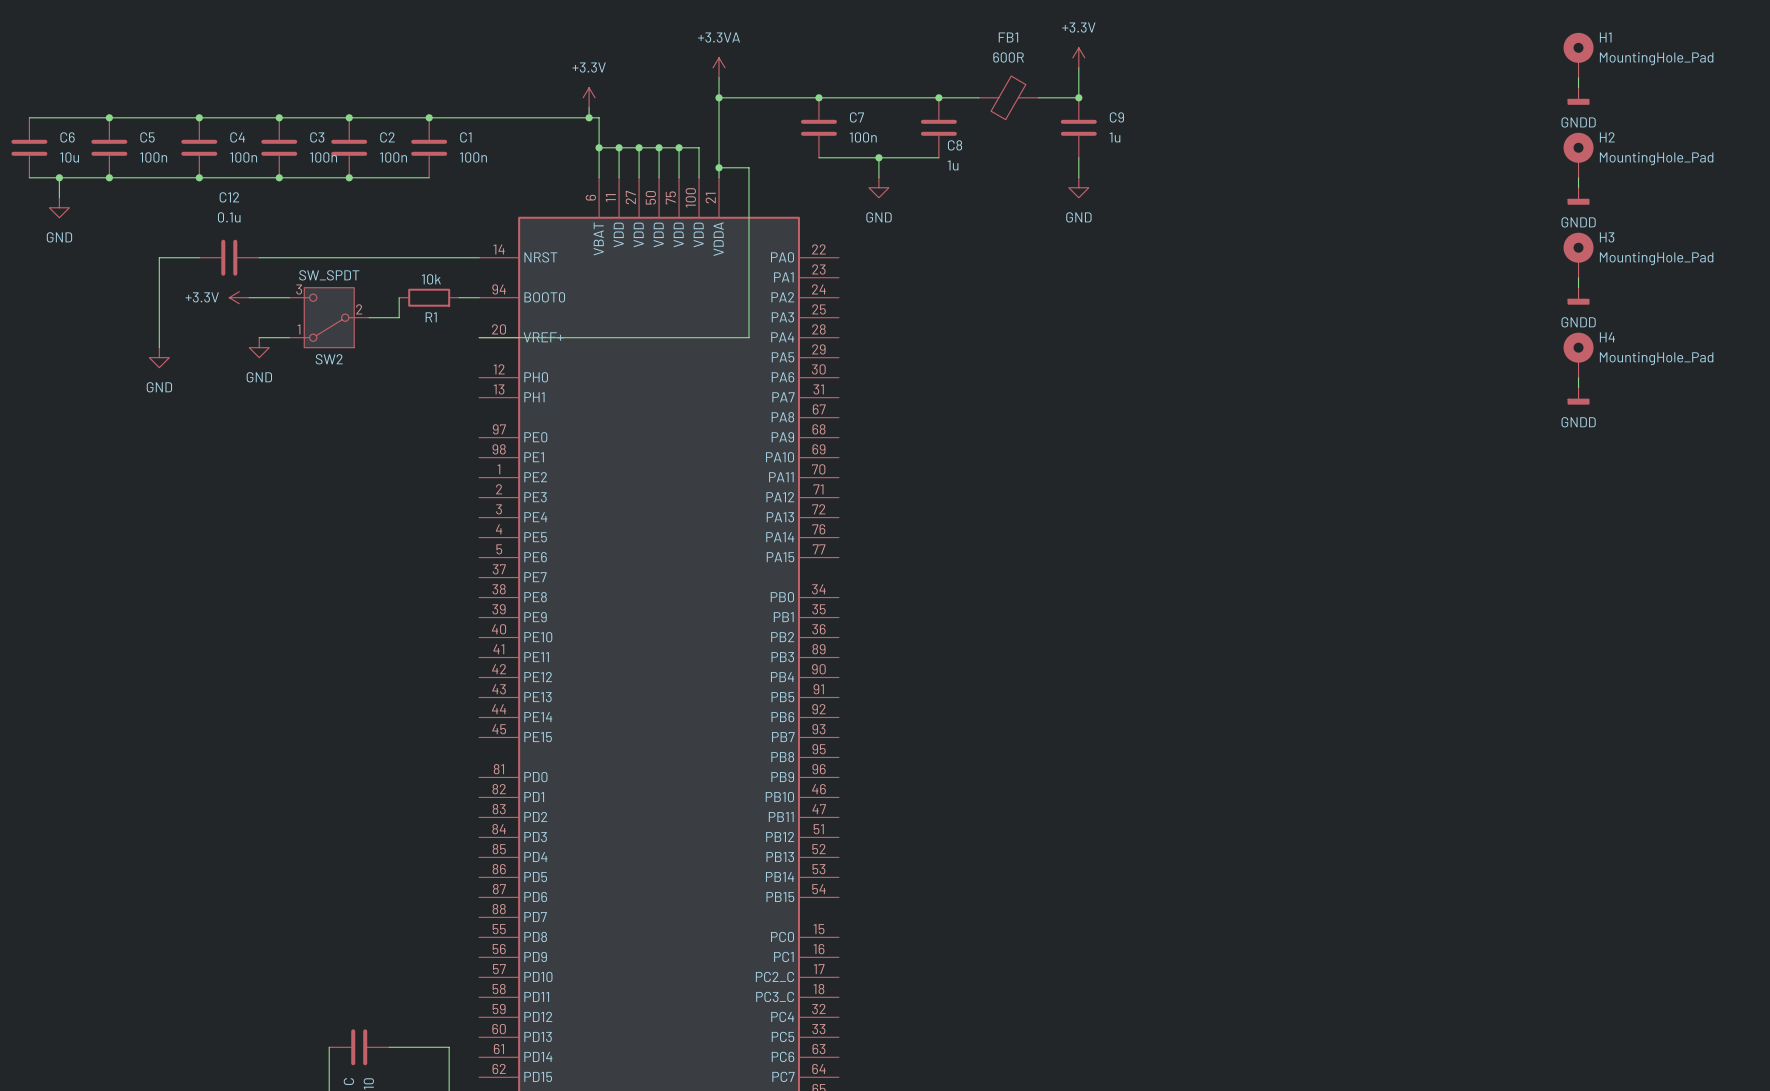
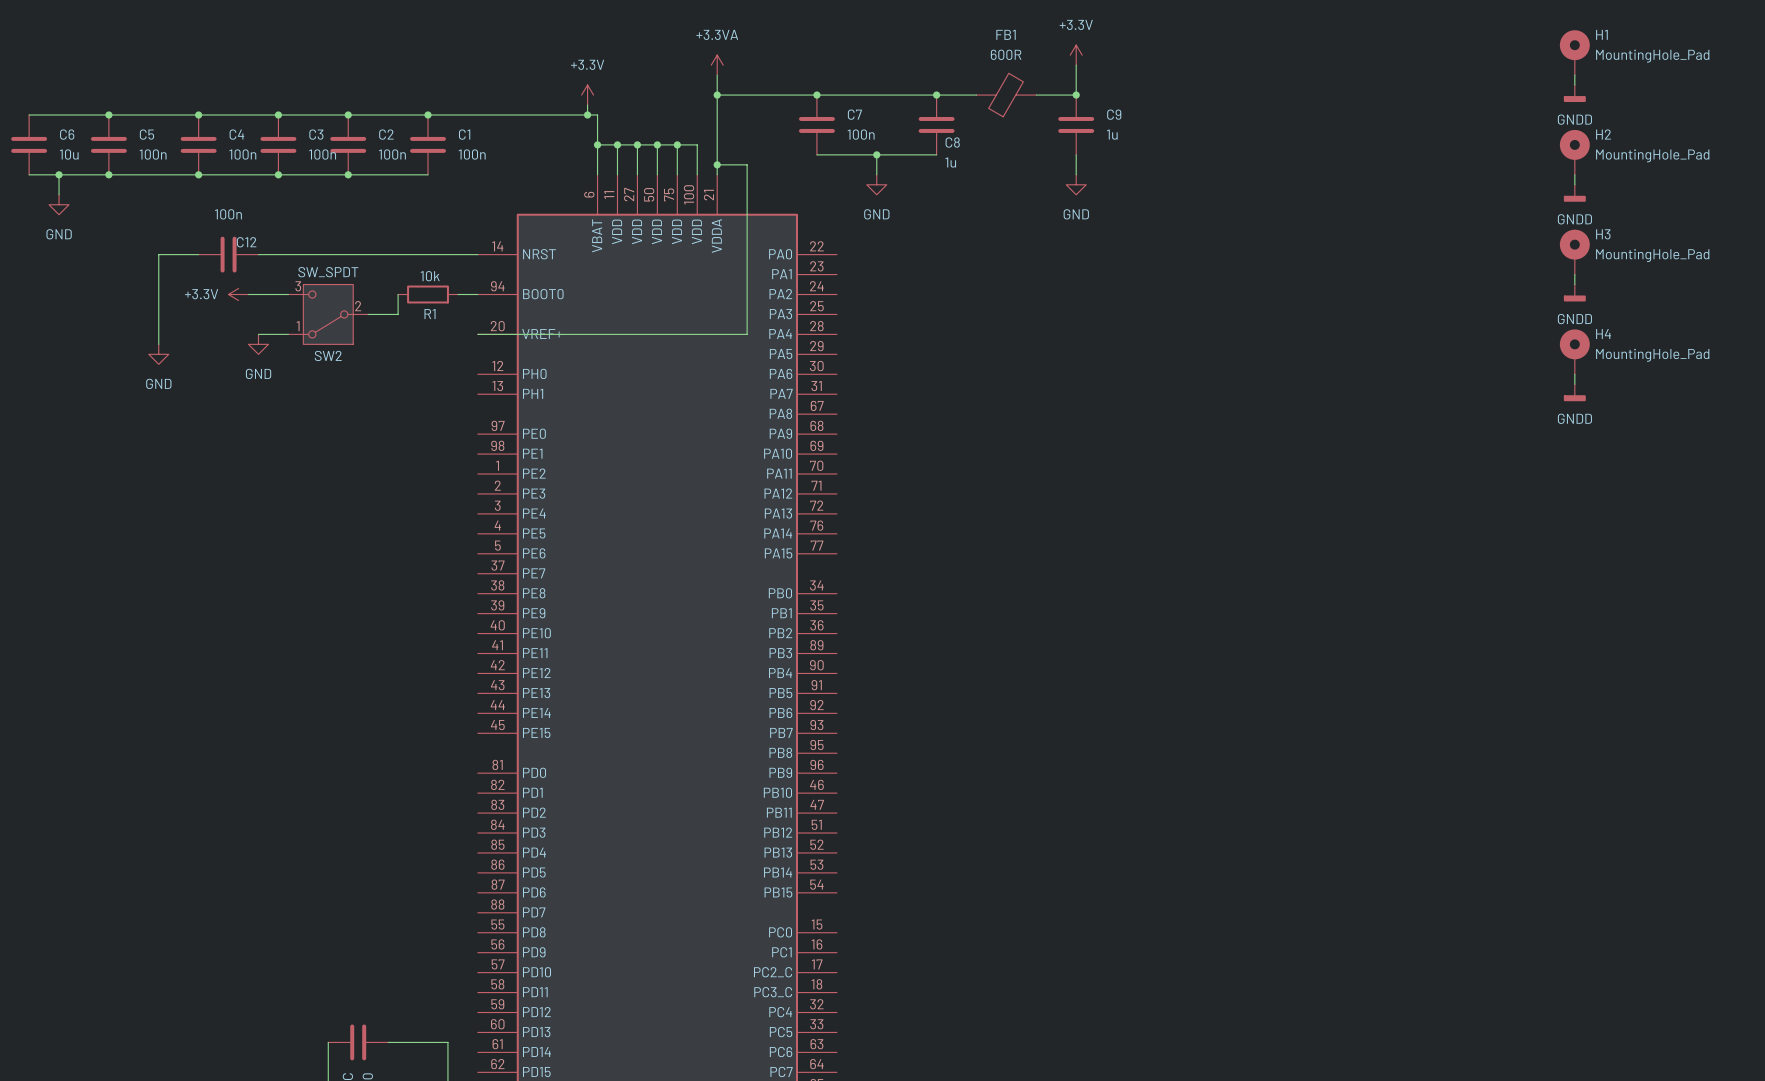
C12 name position: C12 (229, 197) -> C12 (246, 242)
C12 value: 0.1u (229, 217) -> 100n (228, 214)

